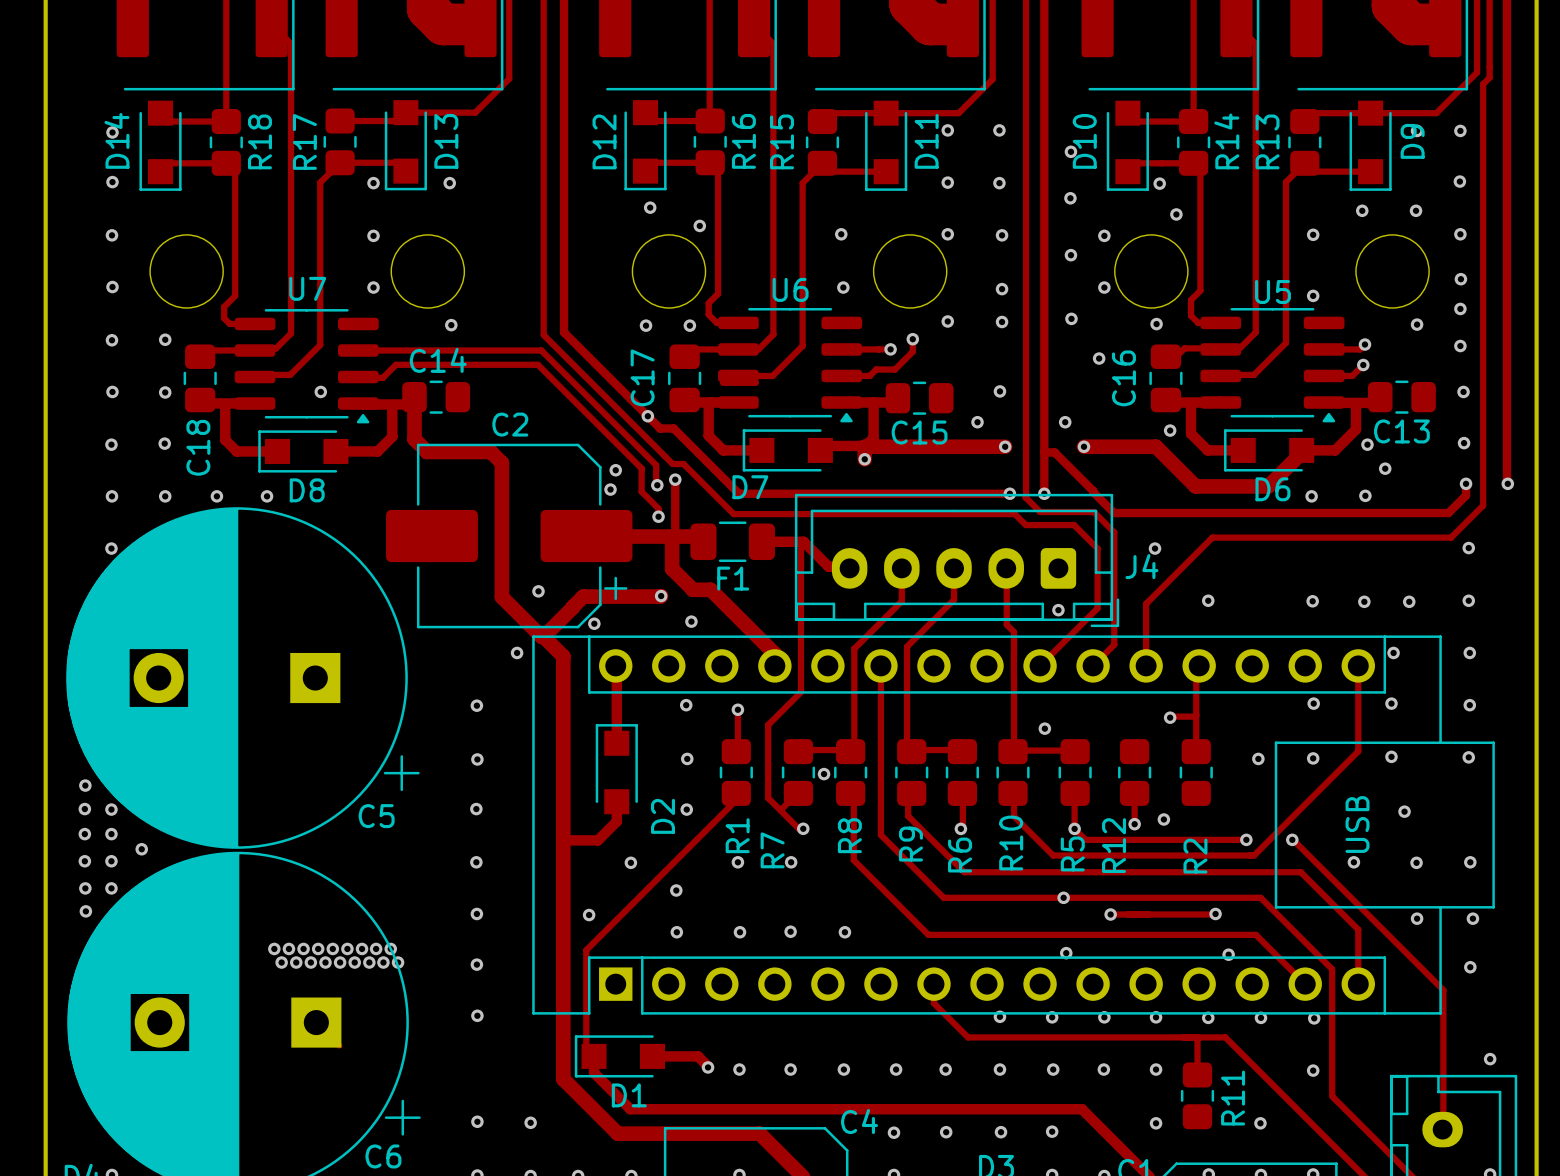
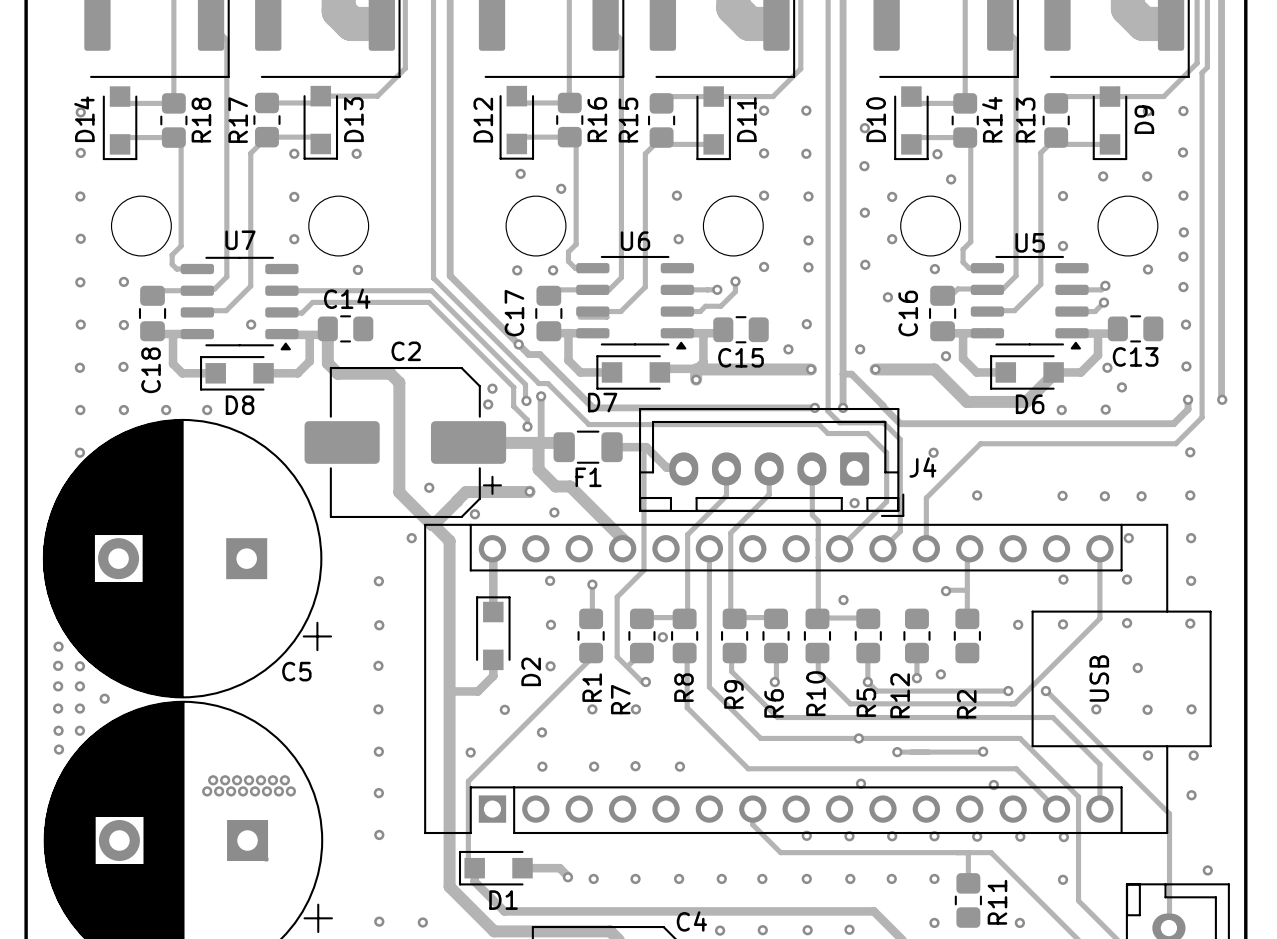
via: (376, 948) -> none
via: (390, 948) -> none
via: none -> (207, 791)
via: (383, 962) -> none
via: (398, 962) -> none

